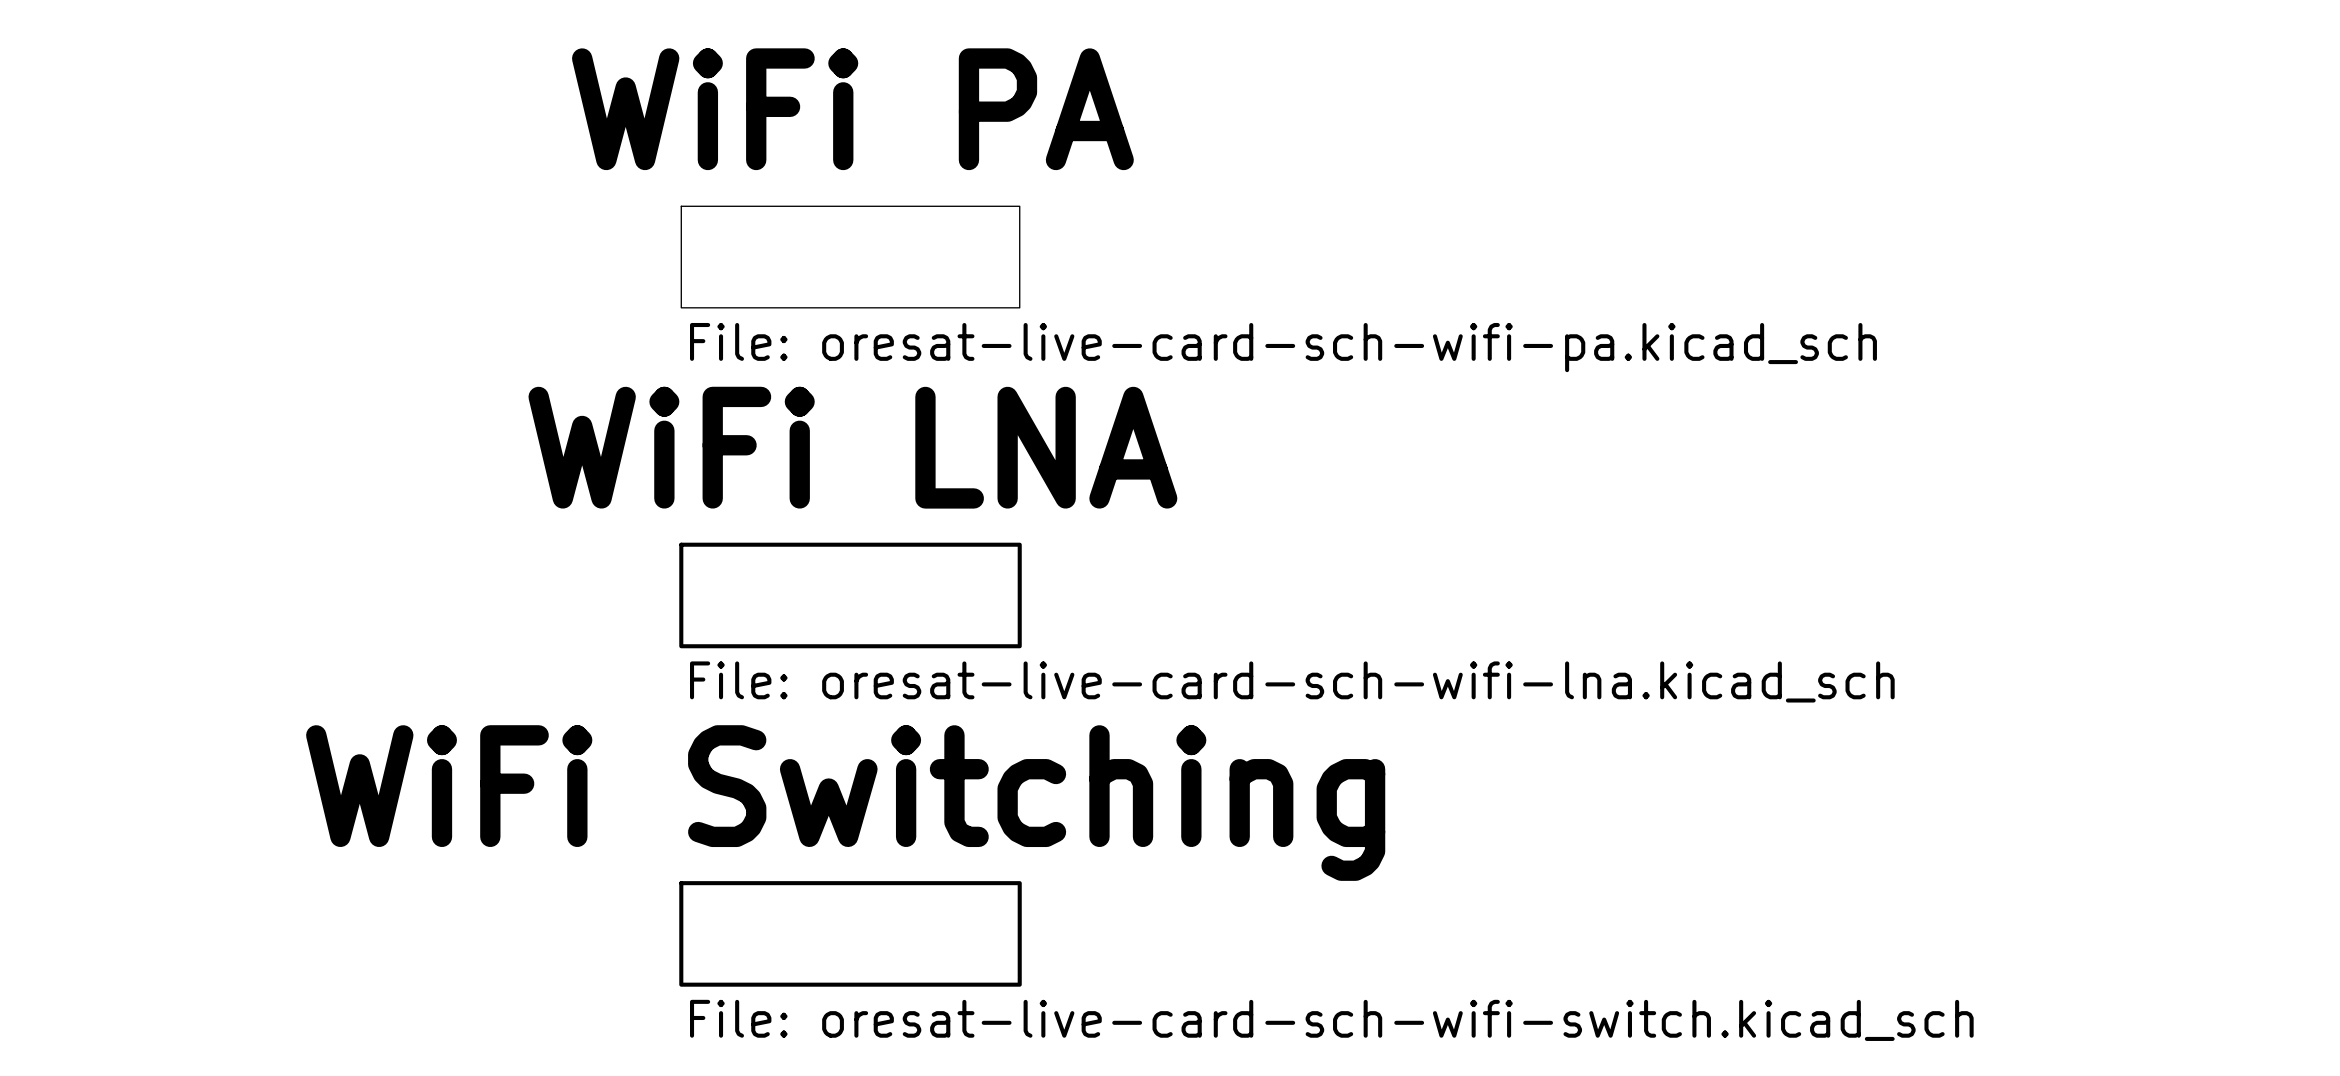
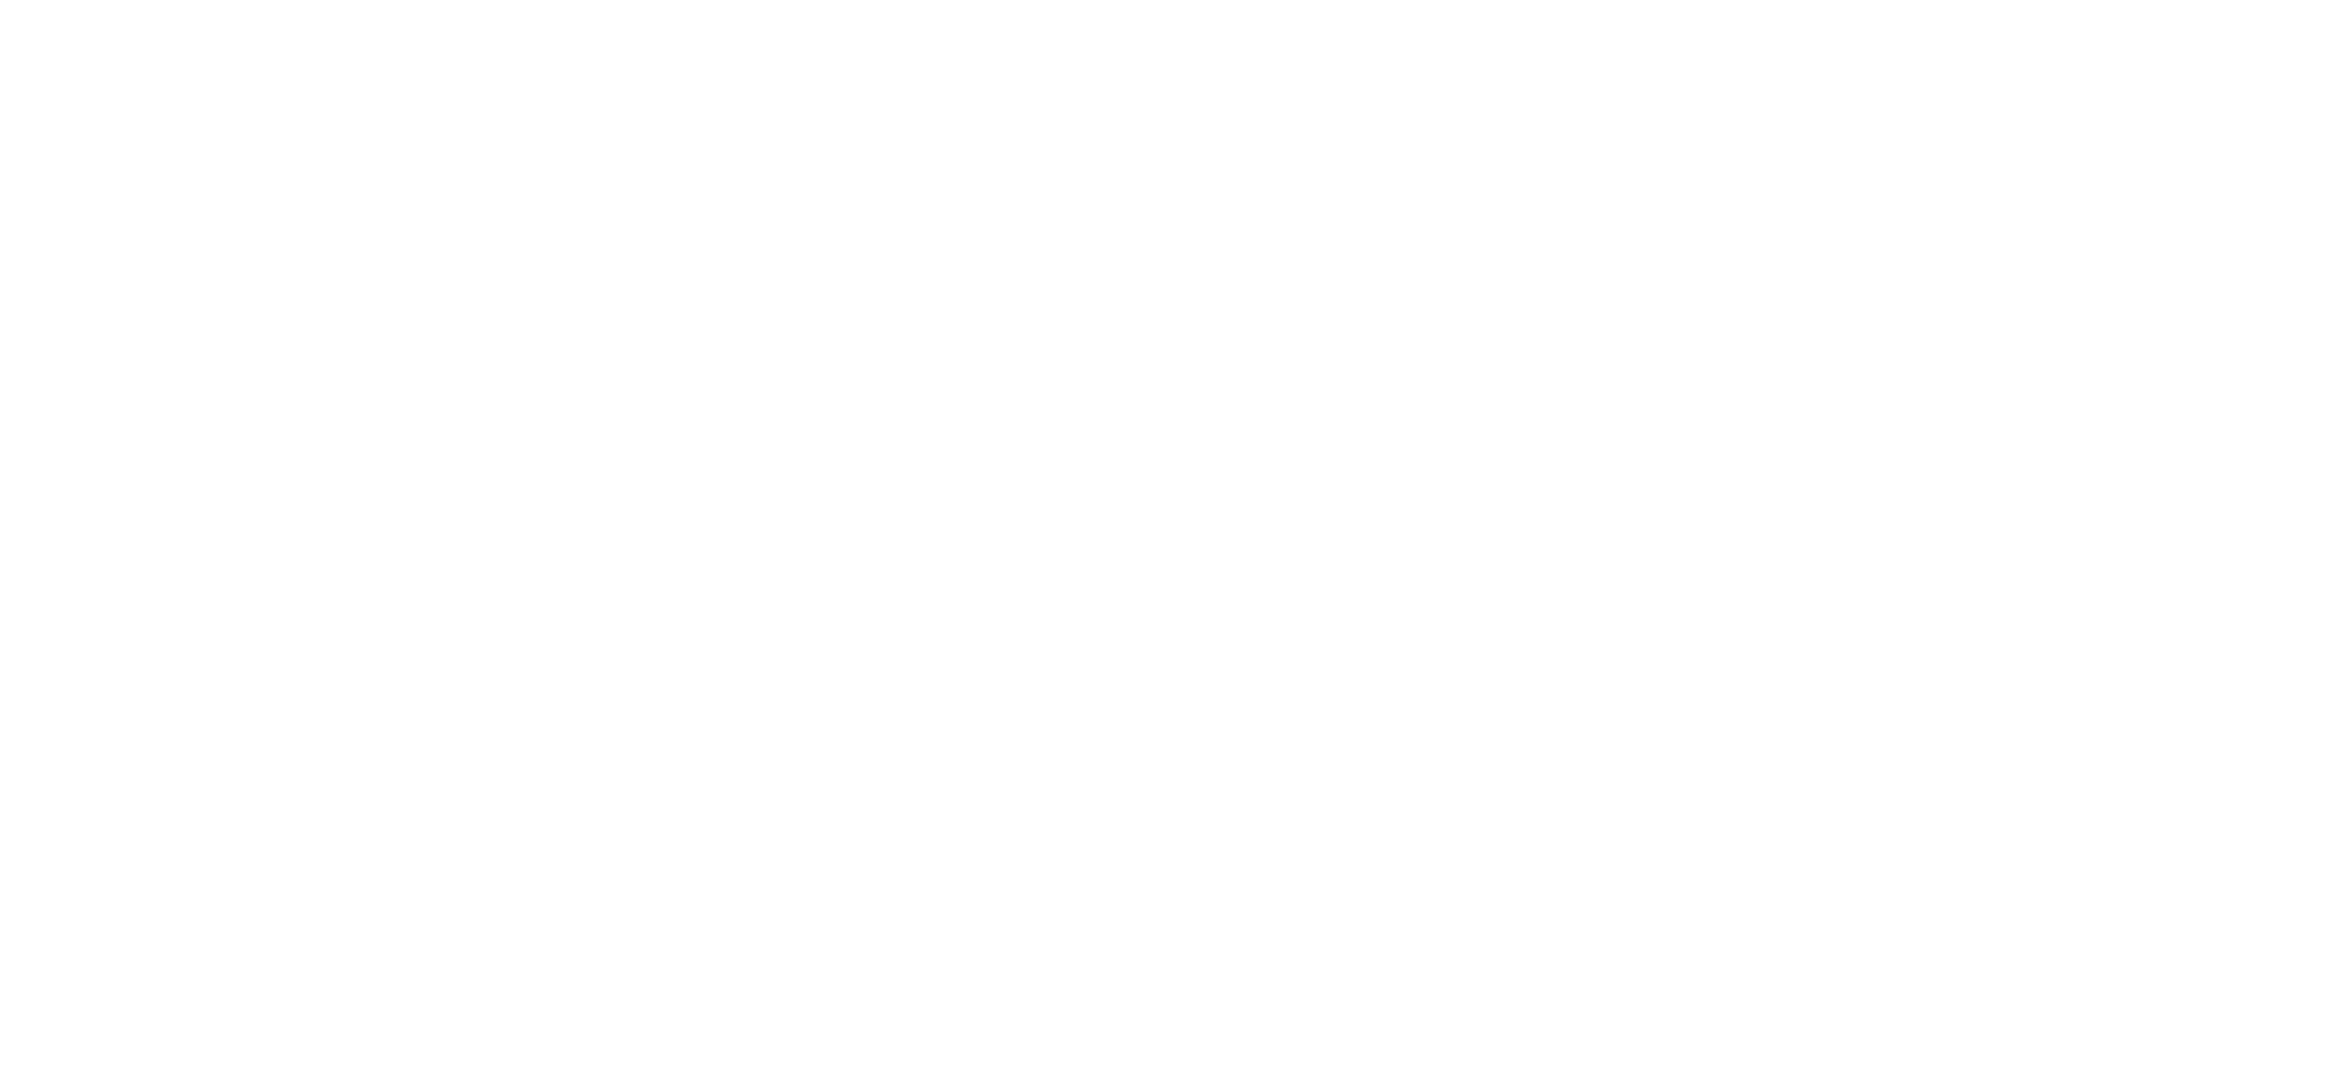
sheet WiFi PA: File: oresat-live-card-sch-wifi-pa.kicad_sch (850, 257) -> none
sheet WiFi LNA: File: oresat-live-card-sch-wifi-lna.kicad_sch (850, 595) -> none
sheet WiFi Switching: File: oresat-live-card-sch-wifi-switch.kicad_sch (850, 933) -> none

